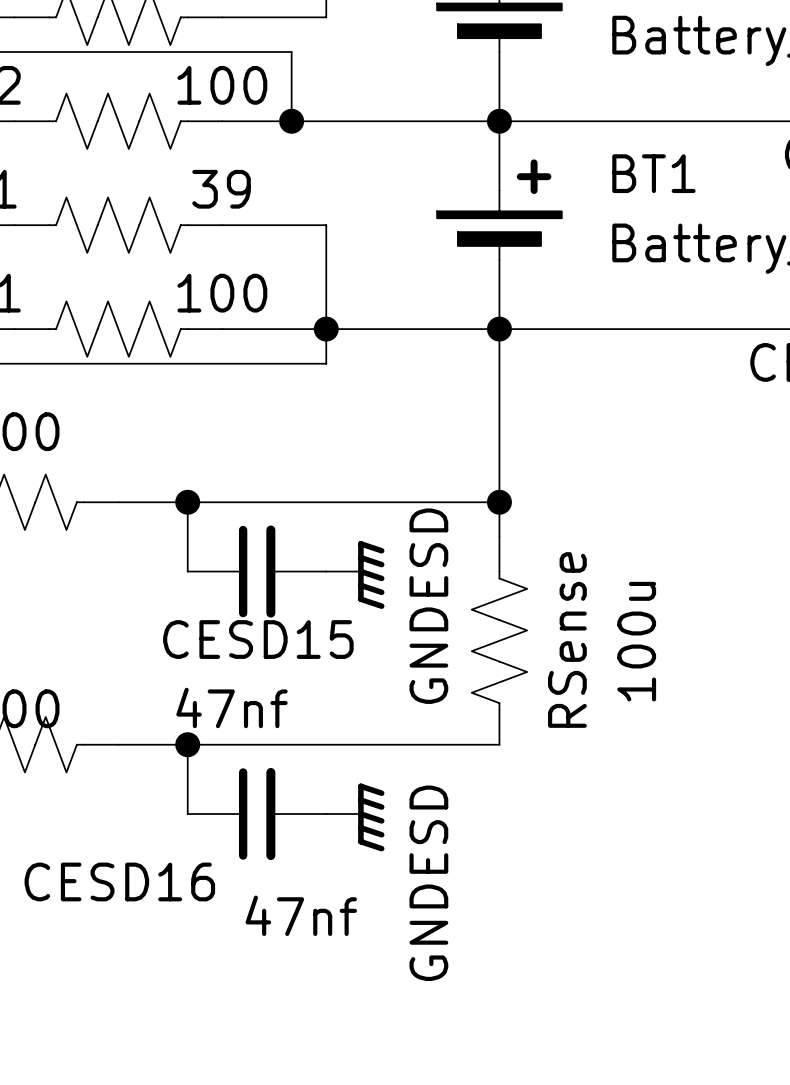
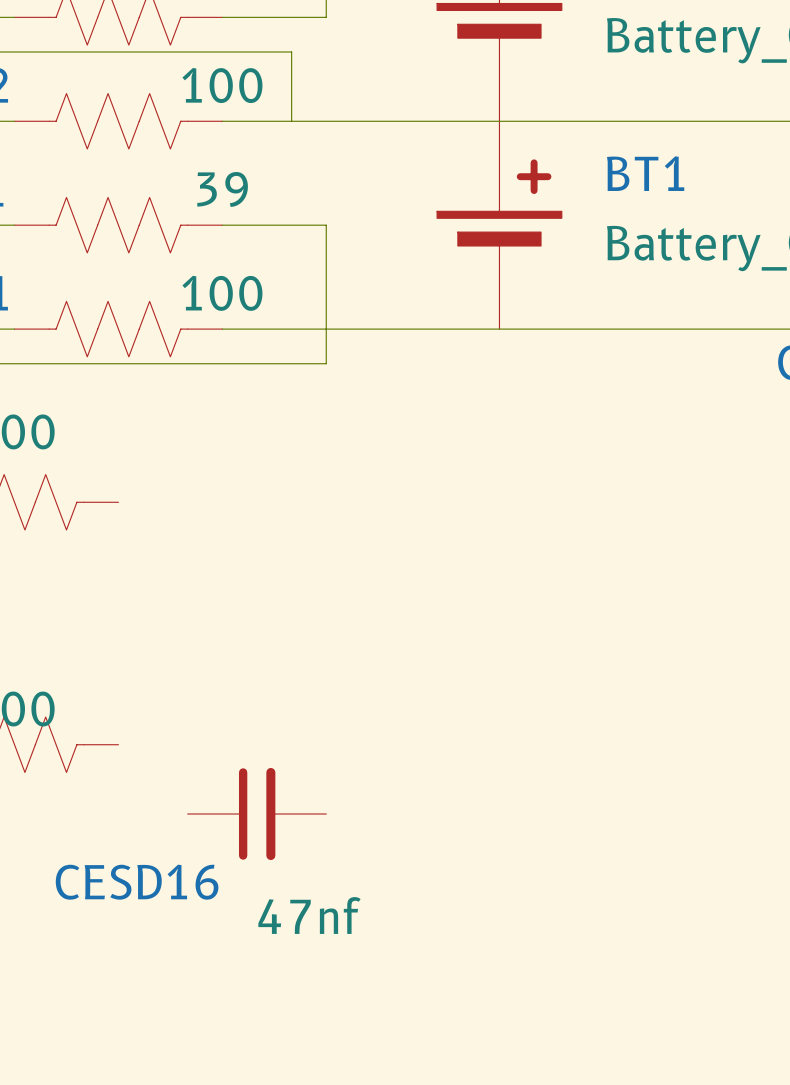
junction: (291, 121) -> none
junction: (499, 121) -> none
junction: (326, 329) -> none
wire: (499, 329) (499, 536) -> none
junction: (499, 329) -> none
wire: (118, 502) (499, 502) -> none
wire: (187, 502) (187, 571) -> none
junction: (187, 502) -> none
junction: (499, 502) -> none
CESD15: 47nf (256, 571) -> none
power symbol: GNDESD (355, 575) -> none
RSense: 100u (499, 640) -> none
wire: (118, 744) (499, 744) -> none
wire: (187, 744) (187, 814) -> none
junction: (187, 744) -> none
power symbol: GNDESD (355, 817) -> none

